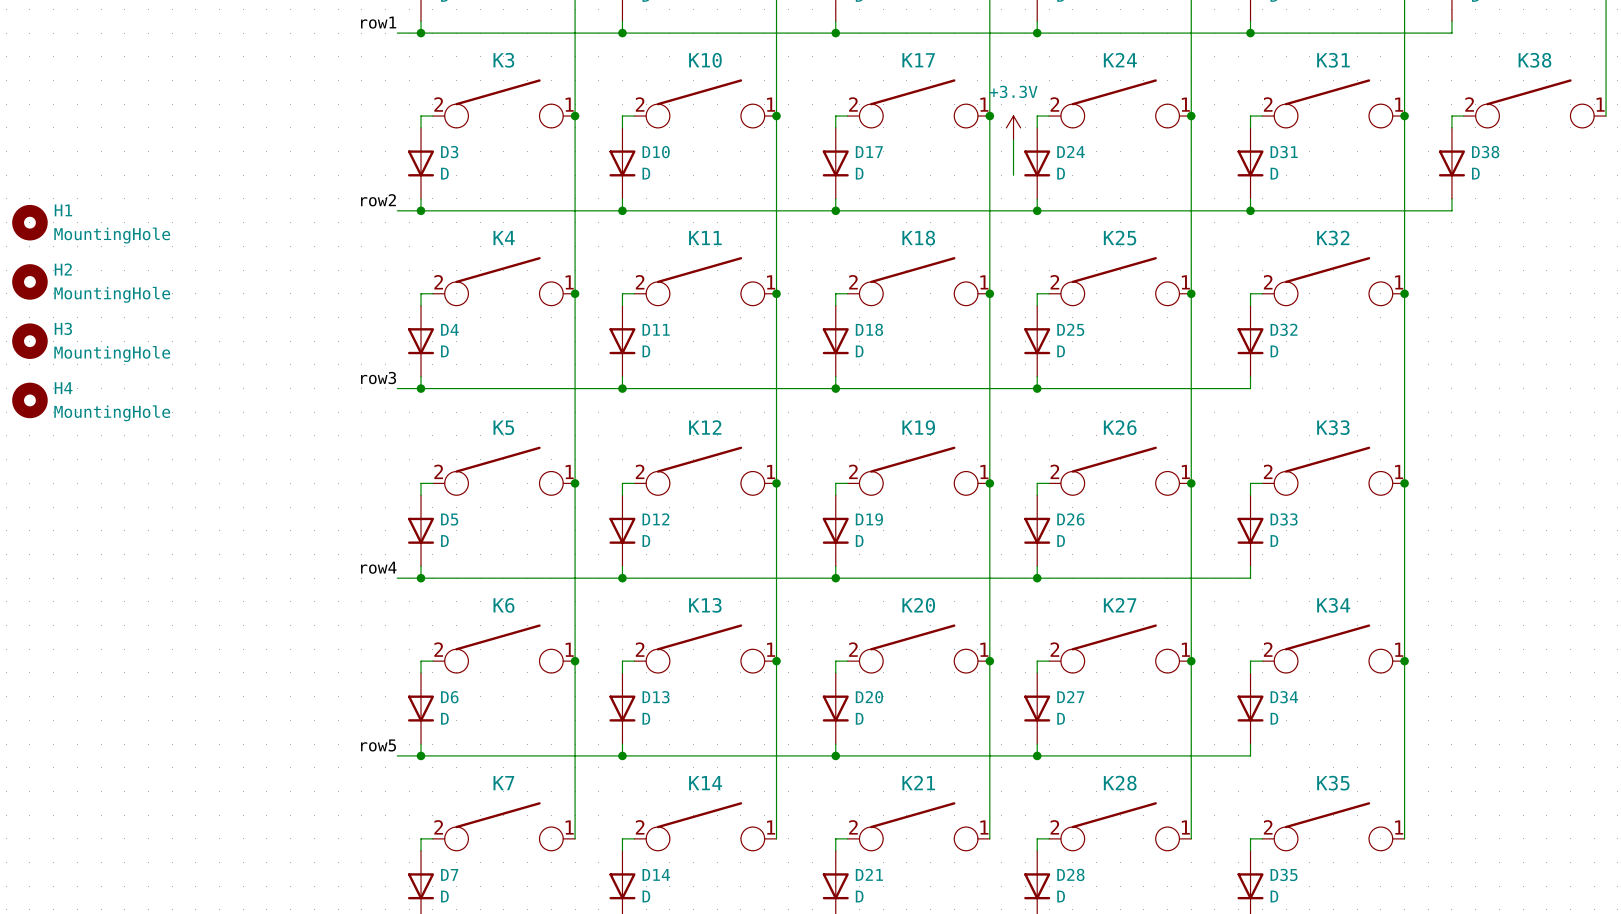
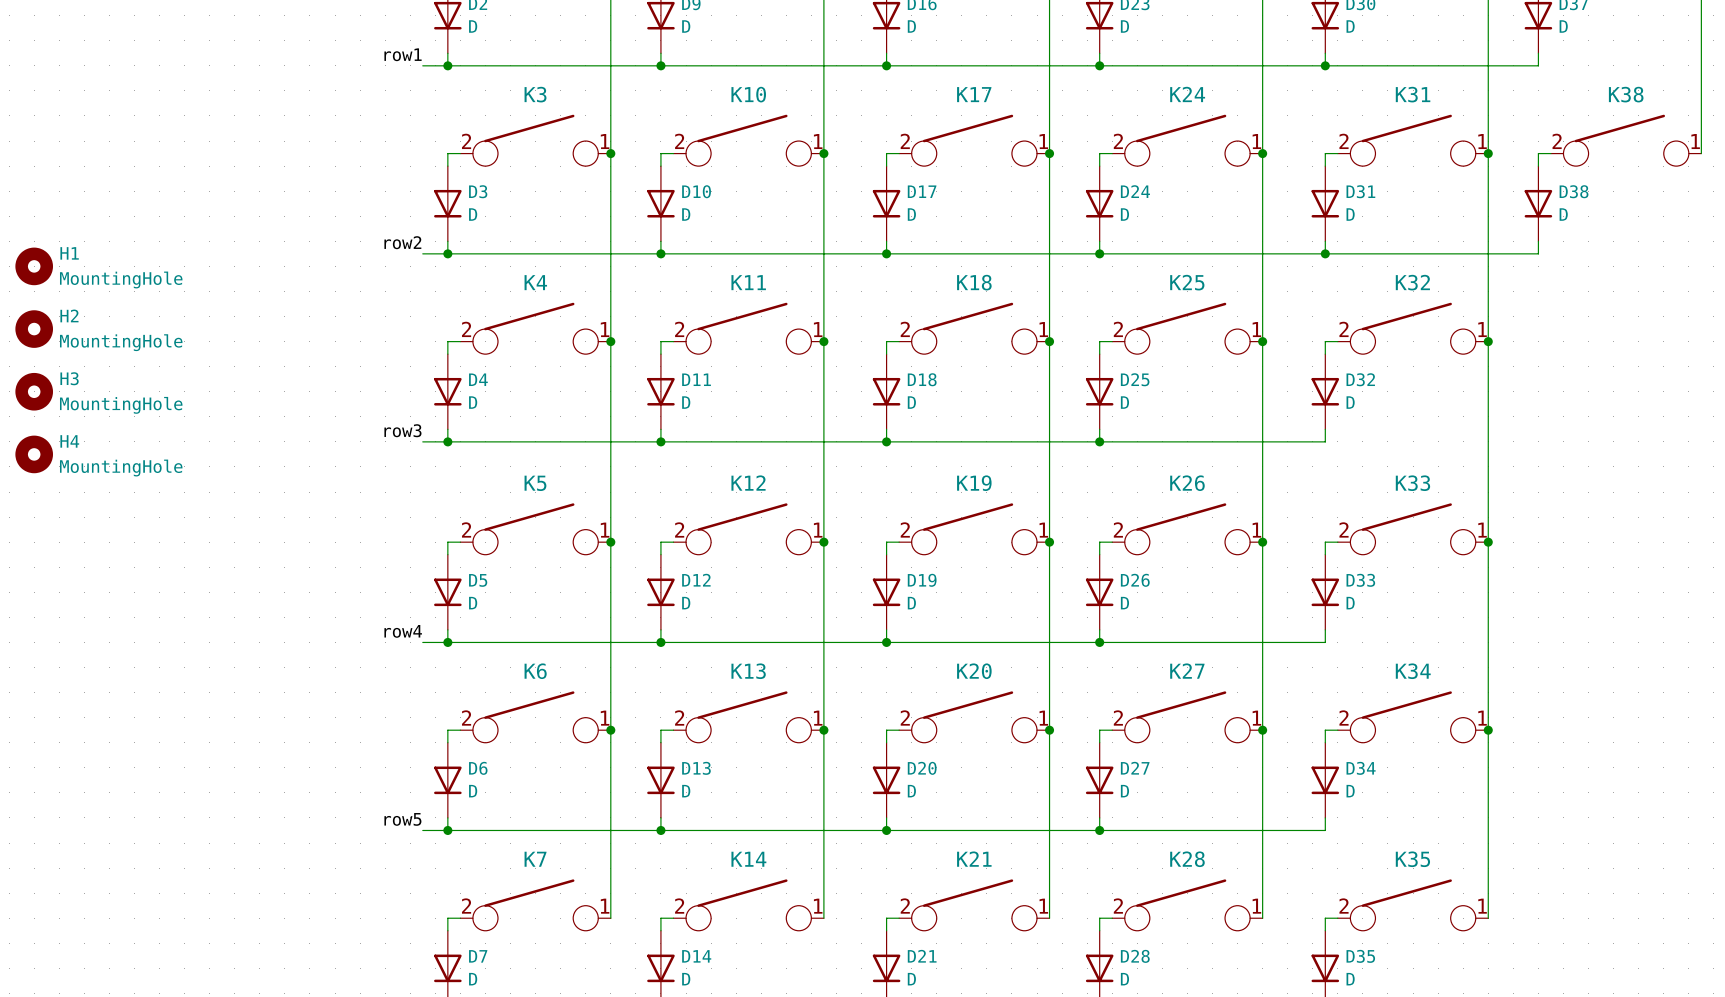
power symbol: +3.3V (1013, 127) -> none
wire: (1013, 139) (1013, 175) -> none

